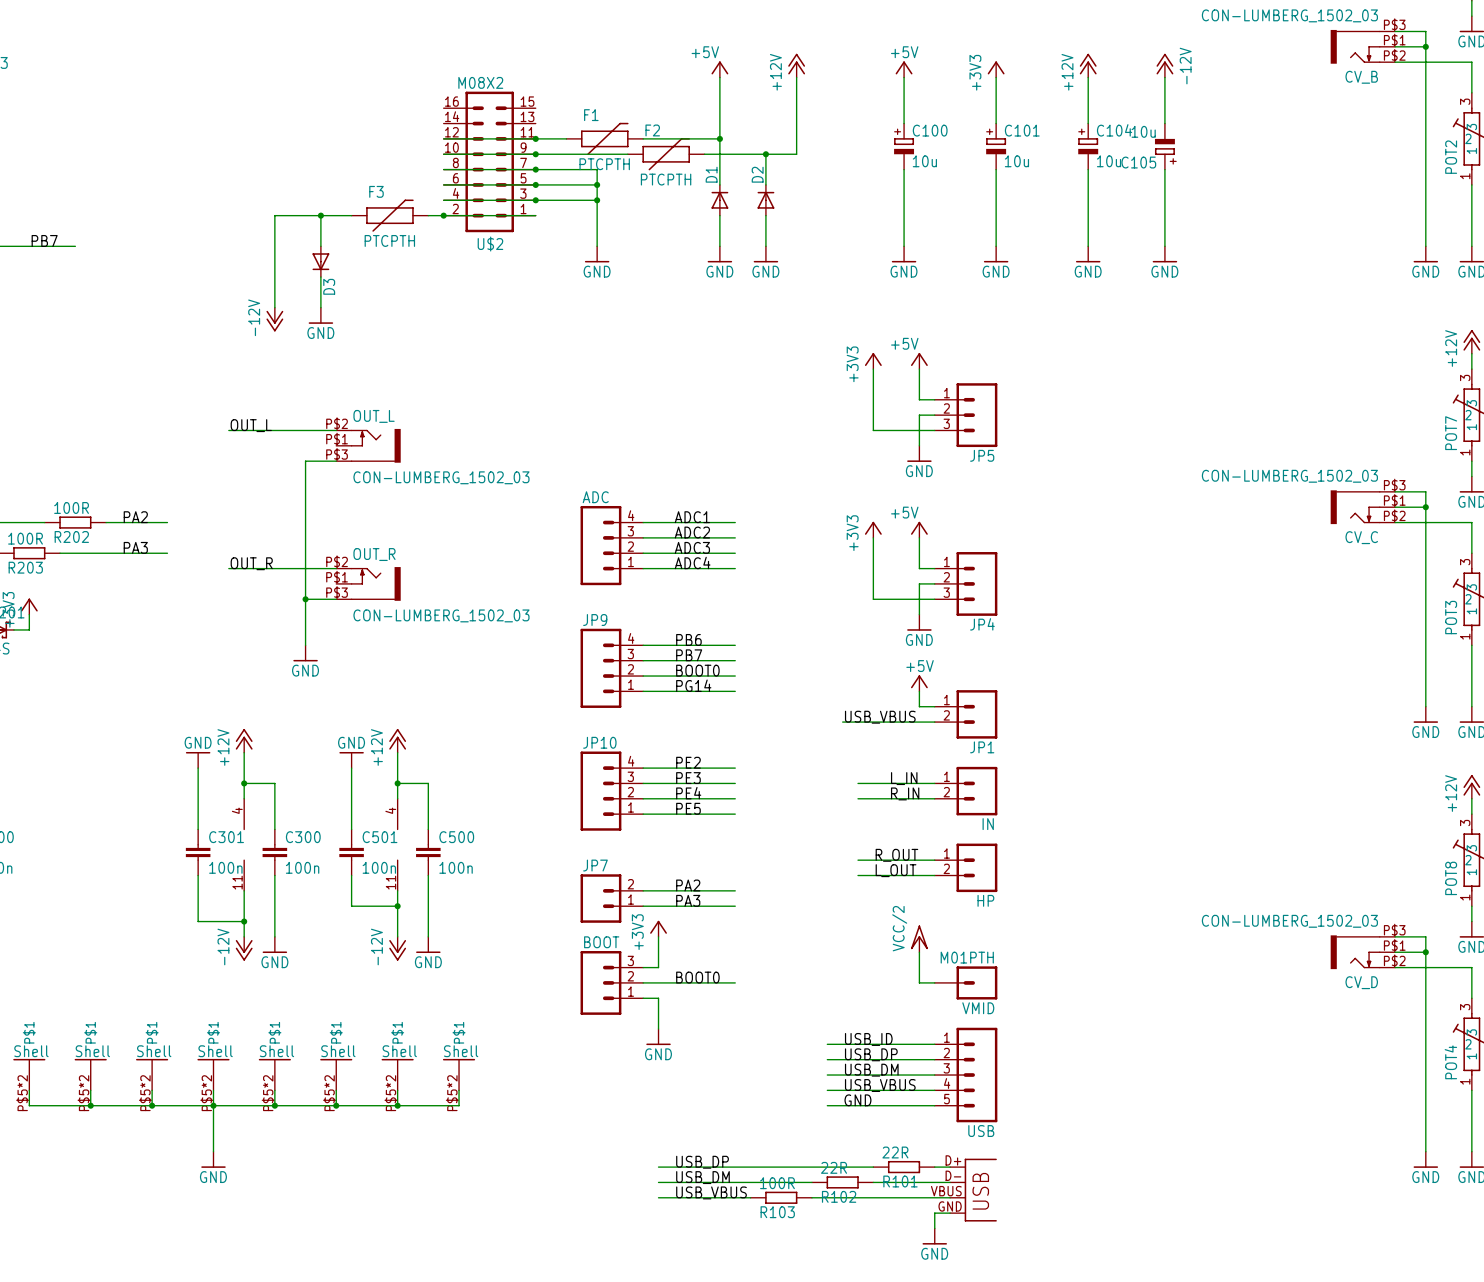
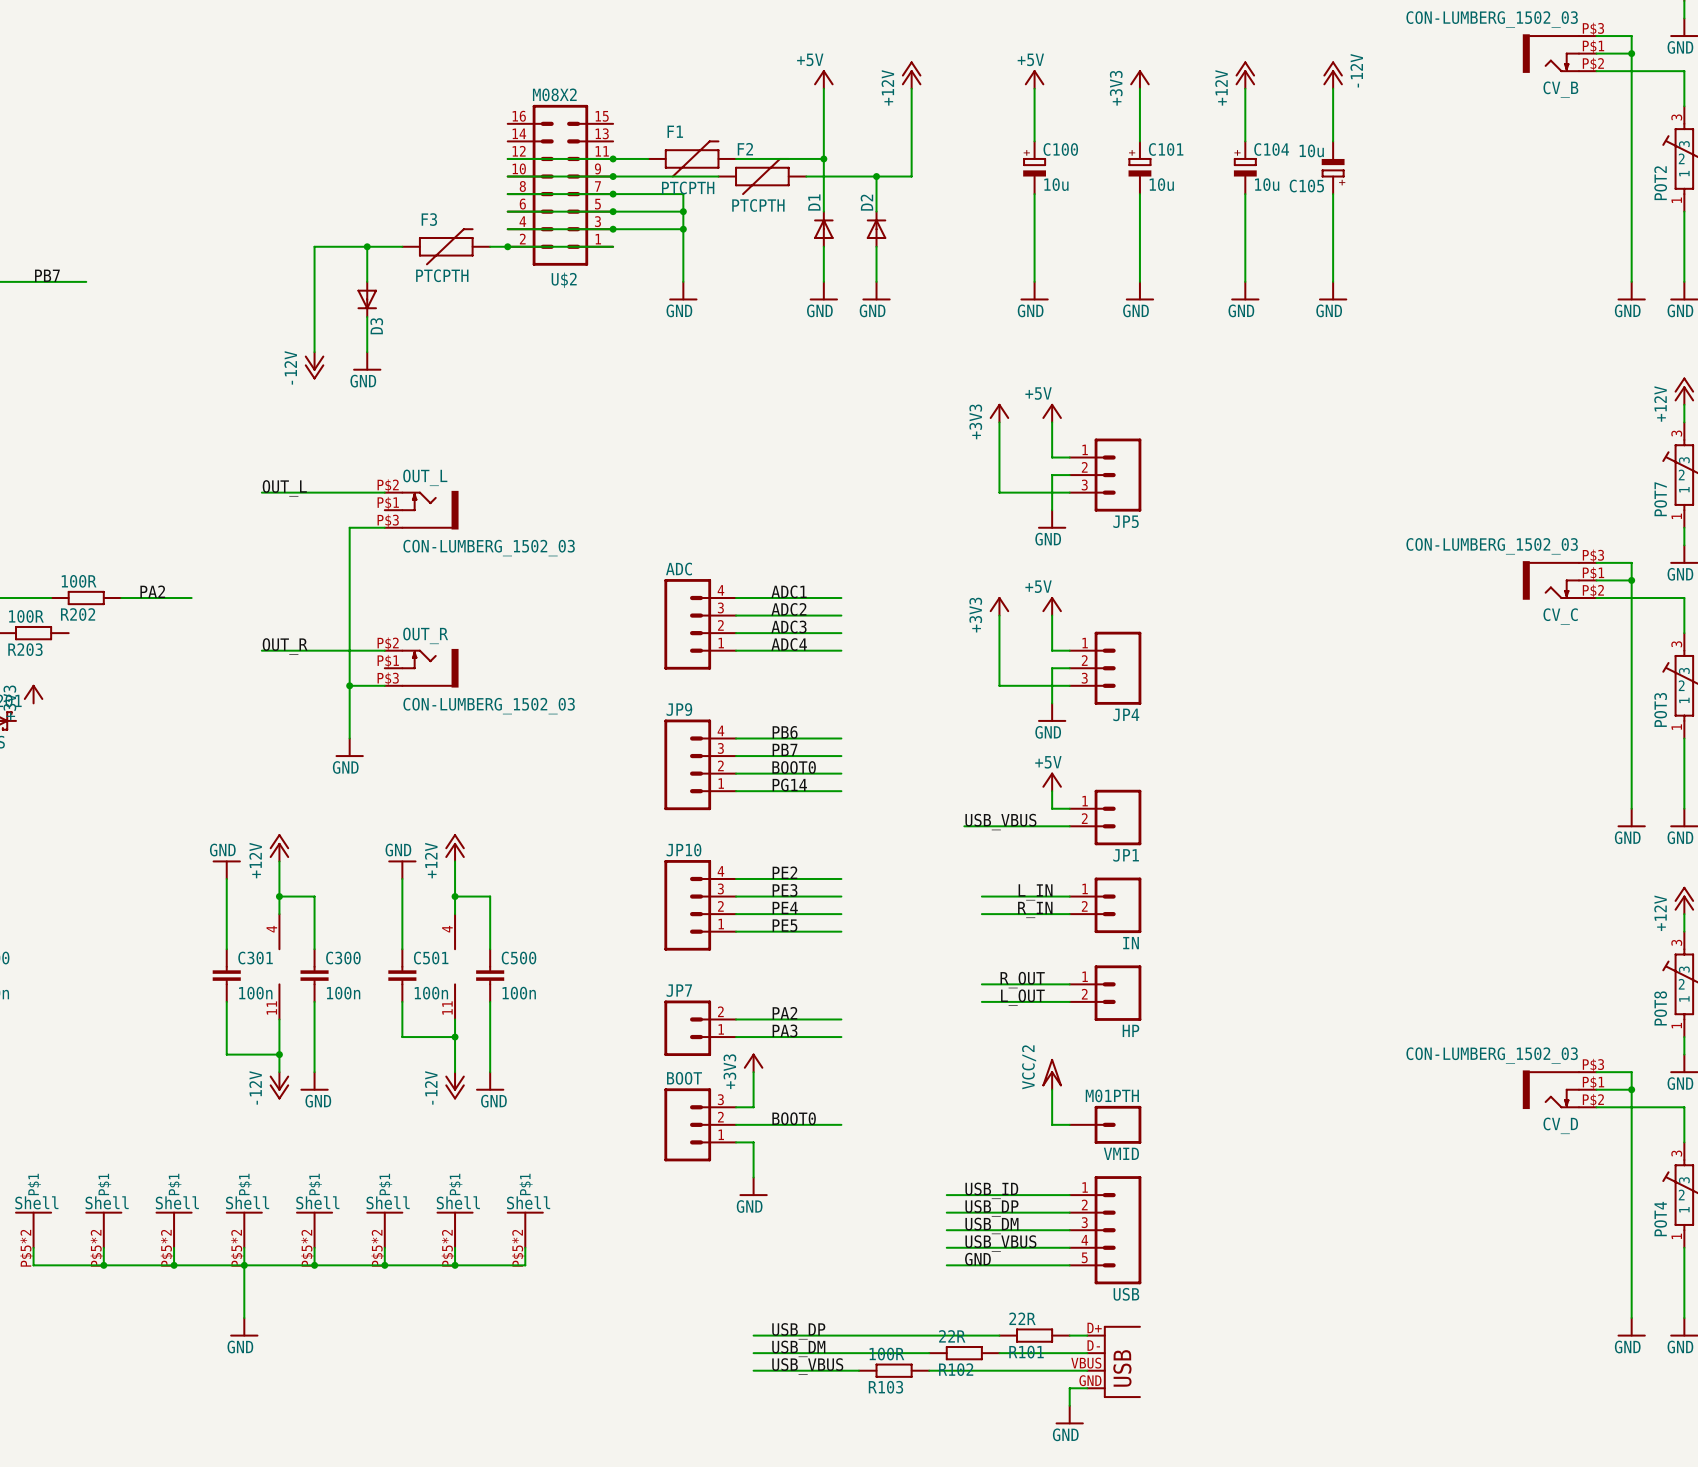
label: PA3 (135, 547) -> none
wire: (60, 553) (167, 553) -> none
wire: (29, 614) (29, 629) (13, 629) -> none

